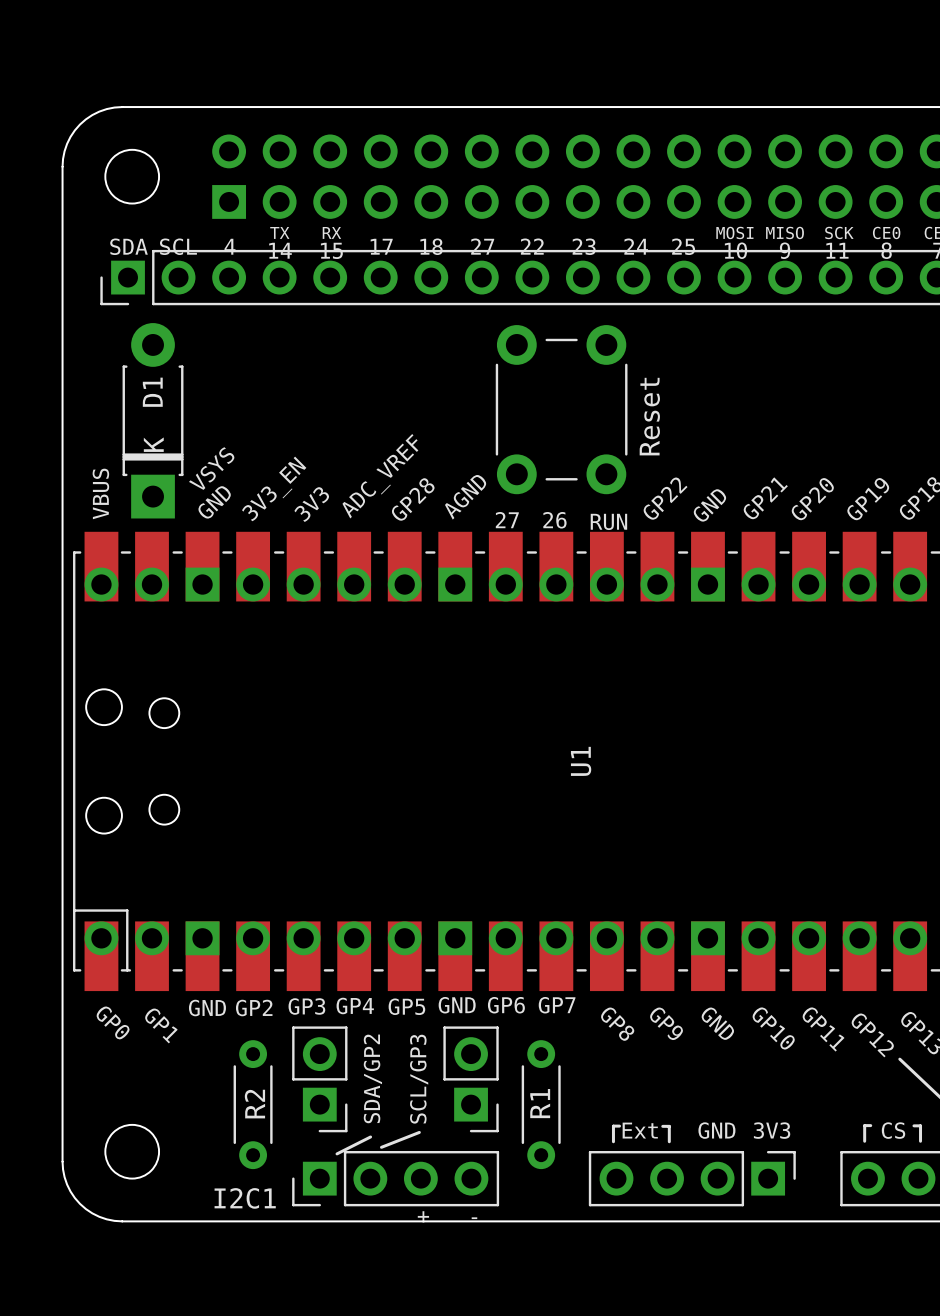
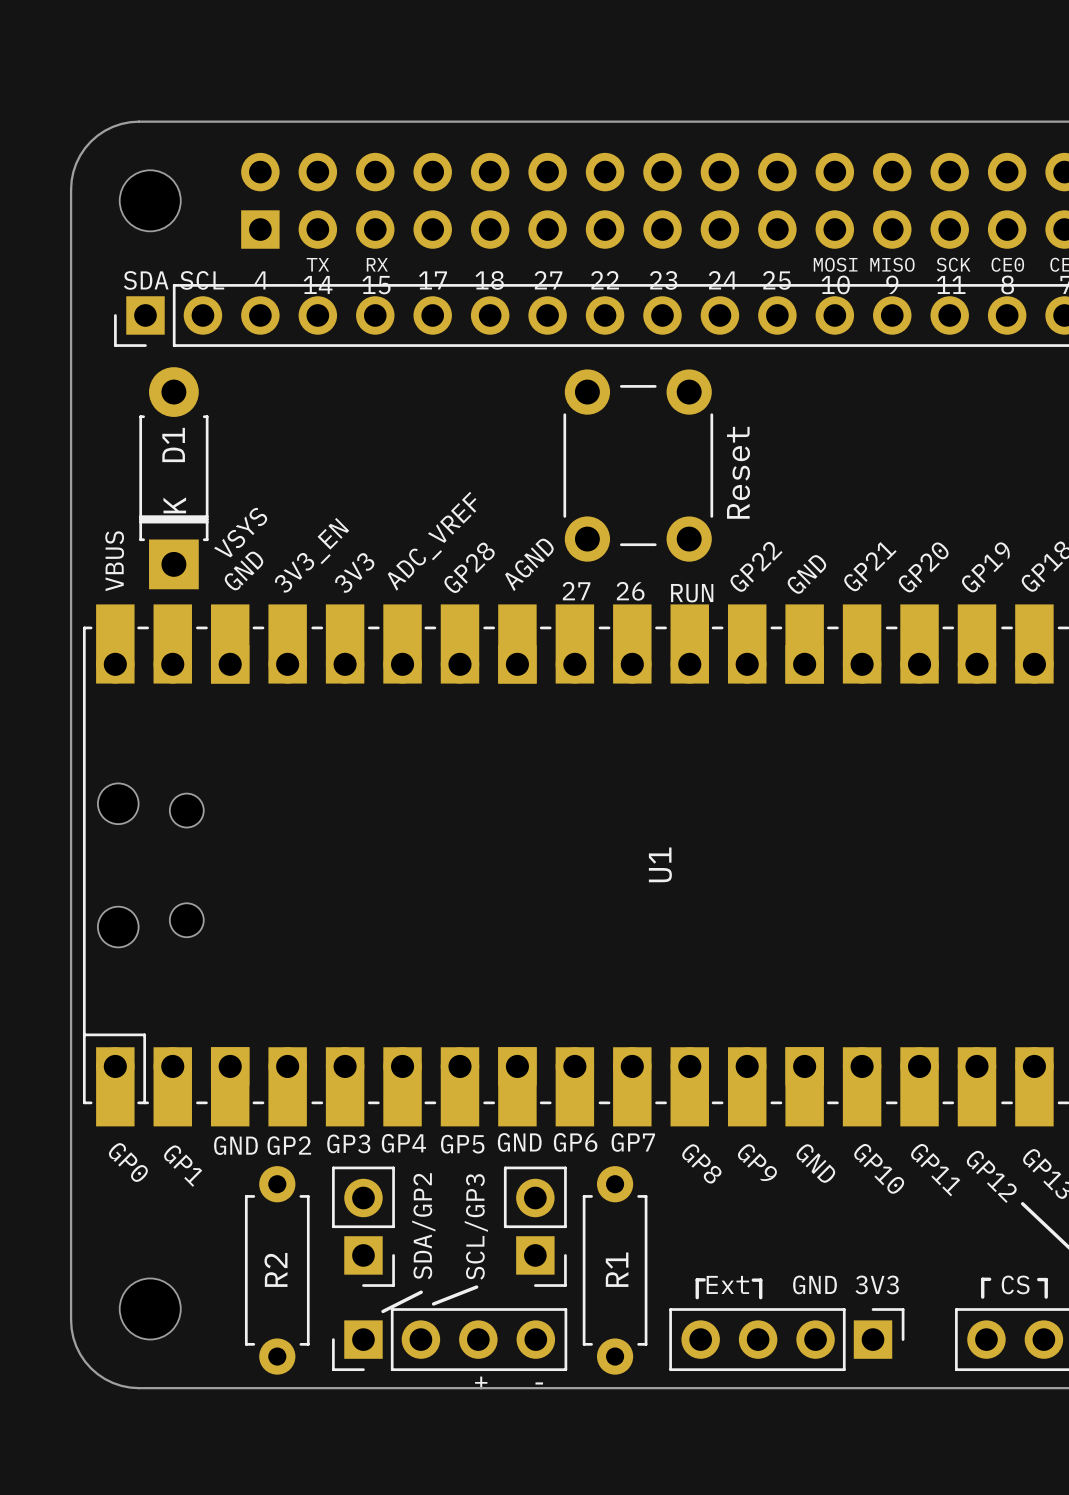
R2 footprint: [233, 1040, 273, 1170] -> [244, 1166, 310, 1375]
R1 footprint: [521, 1040, 561, 1170] -> [582, 1166, 648, 1375]
text: I2C1 (245, 1198) -> none

